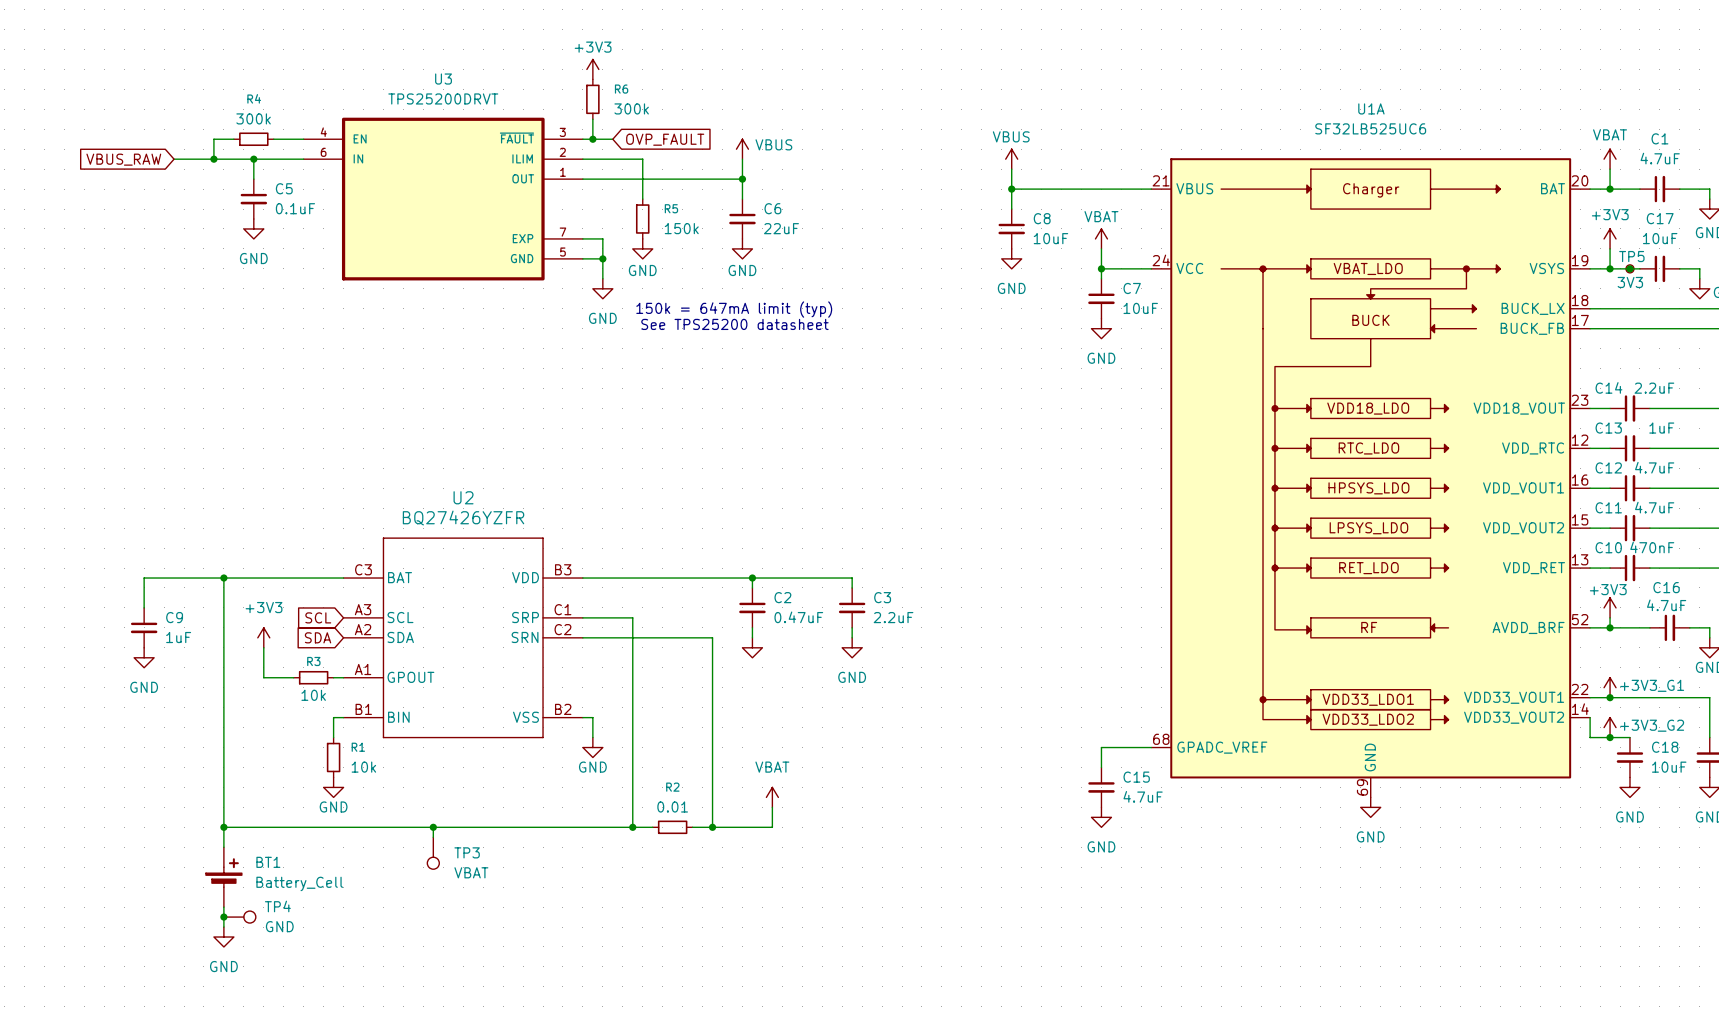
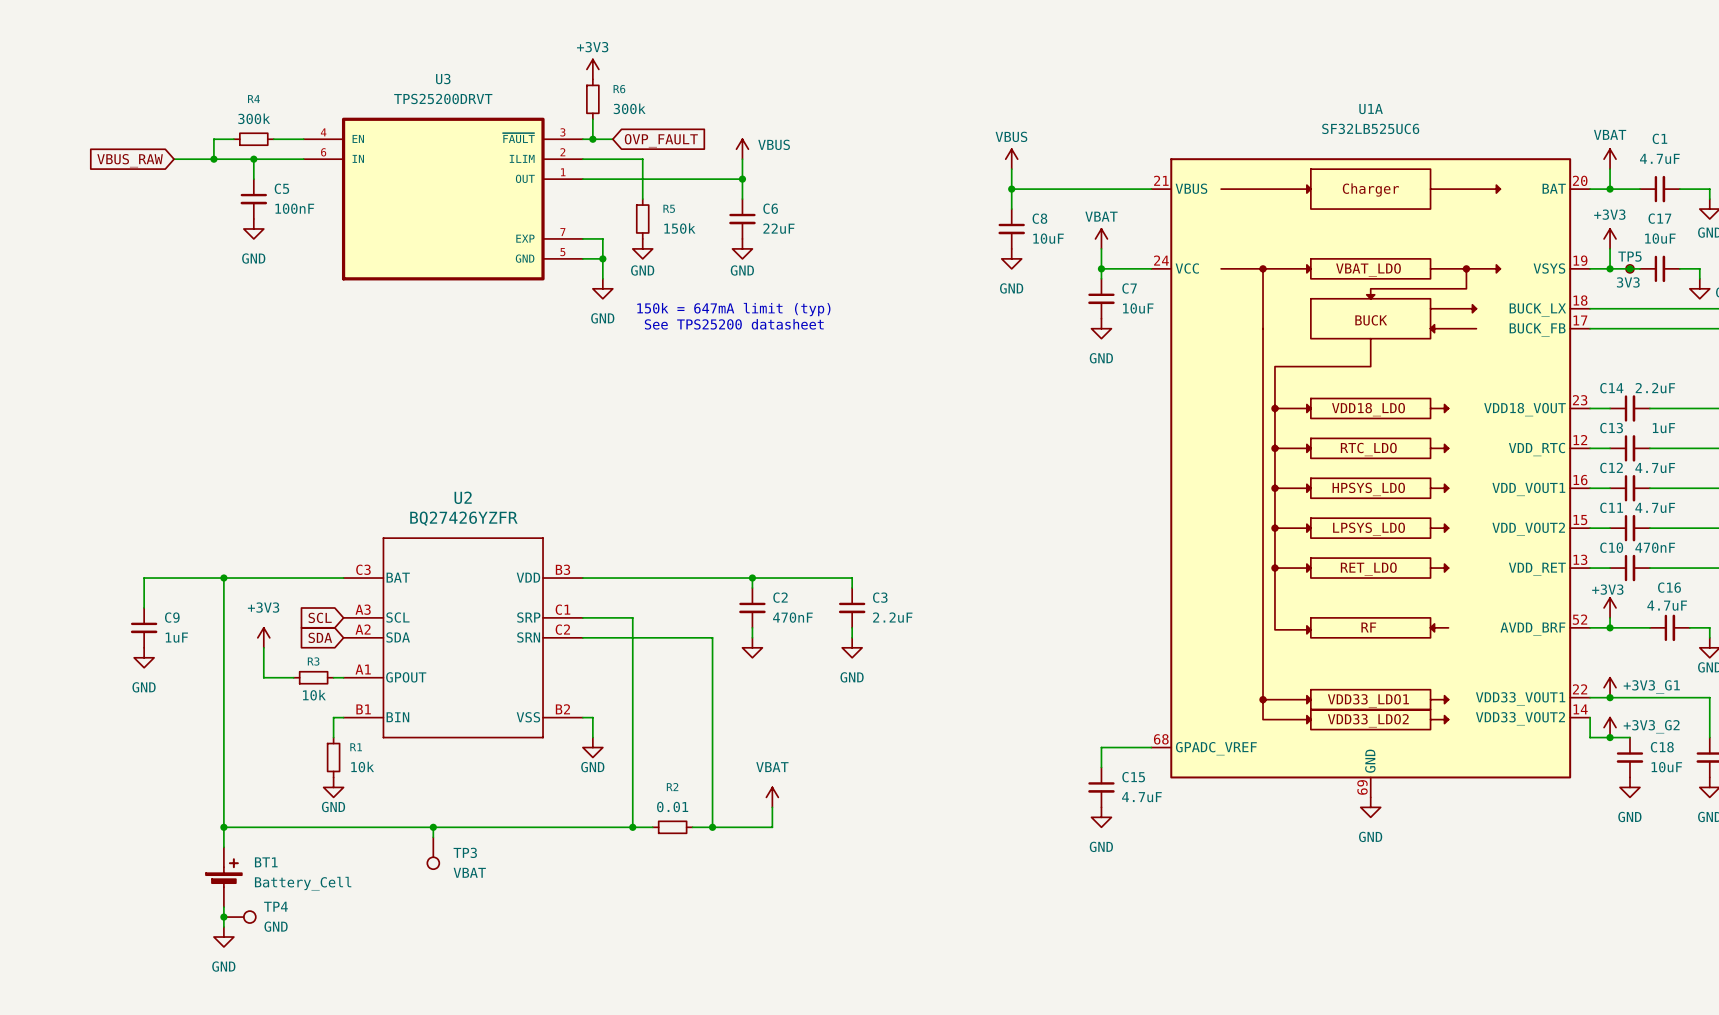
C5 value: 0.1uF (295, 208) -> 100nF (294, 208)
C2 value: 0.47uF (798, 617) -> 470nF (792, 617)

